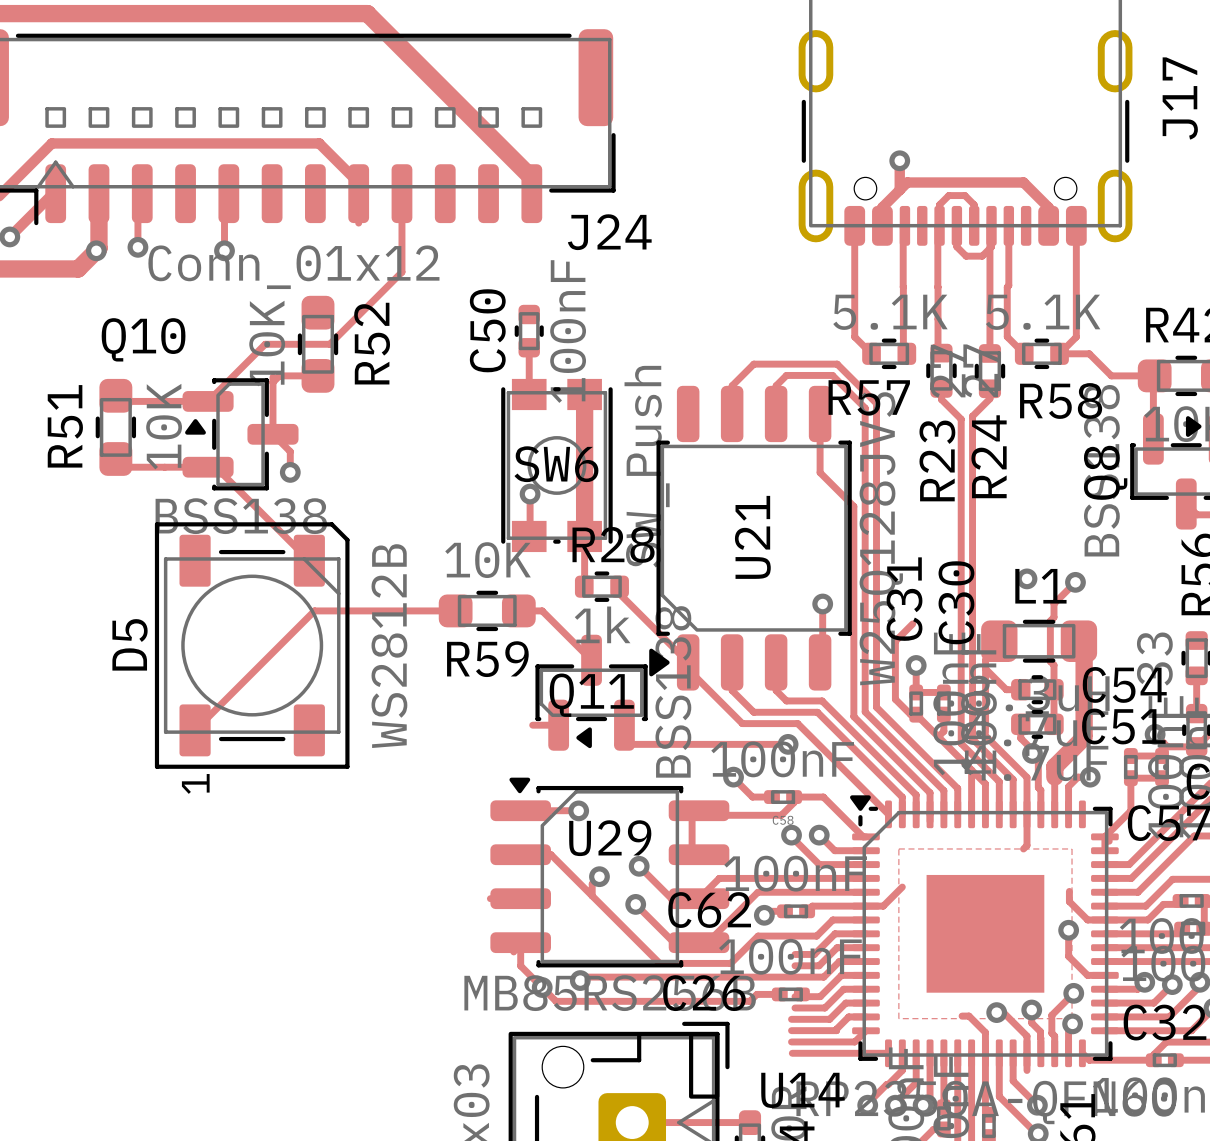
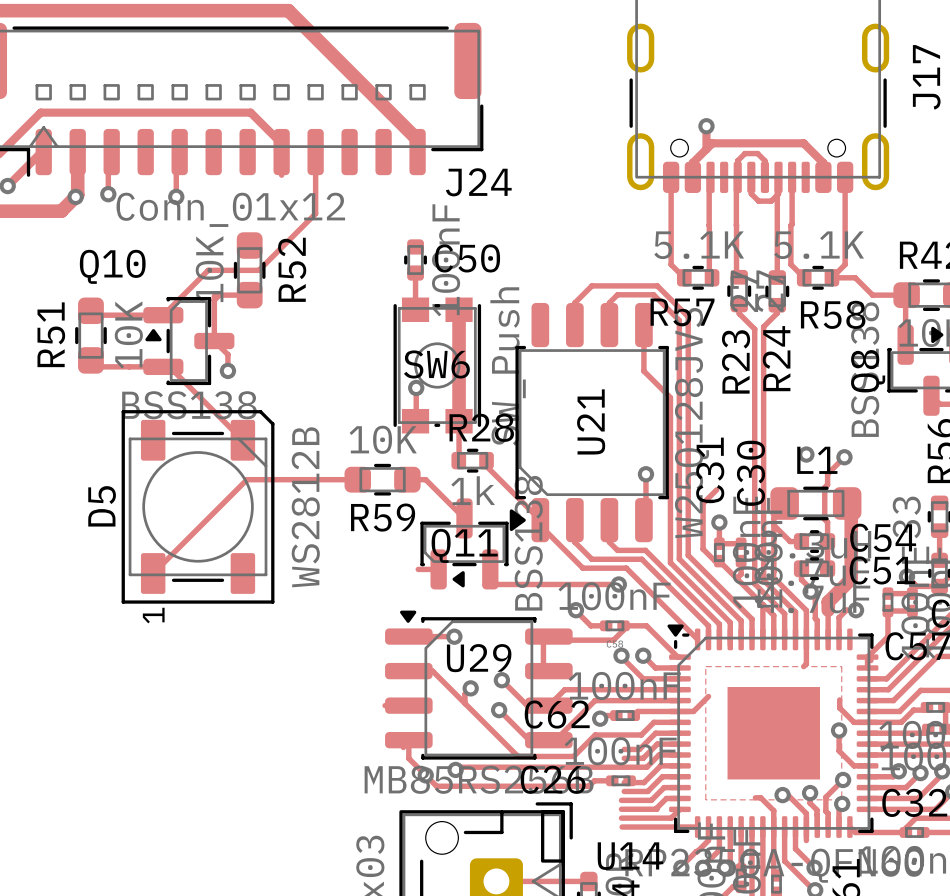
C50 name rotation: 0° (487, 330) -> 90° clockwise (467, 258)

